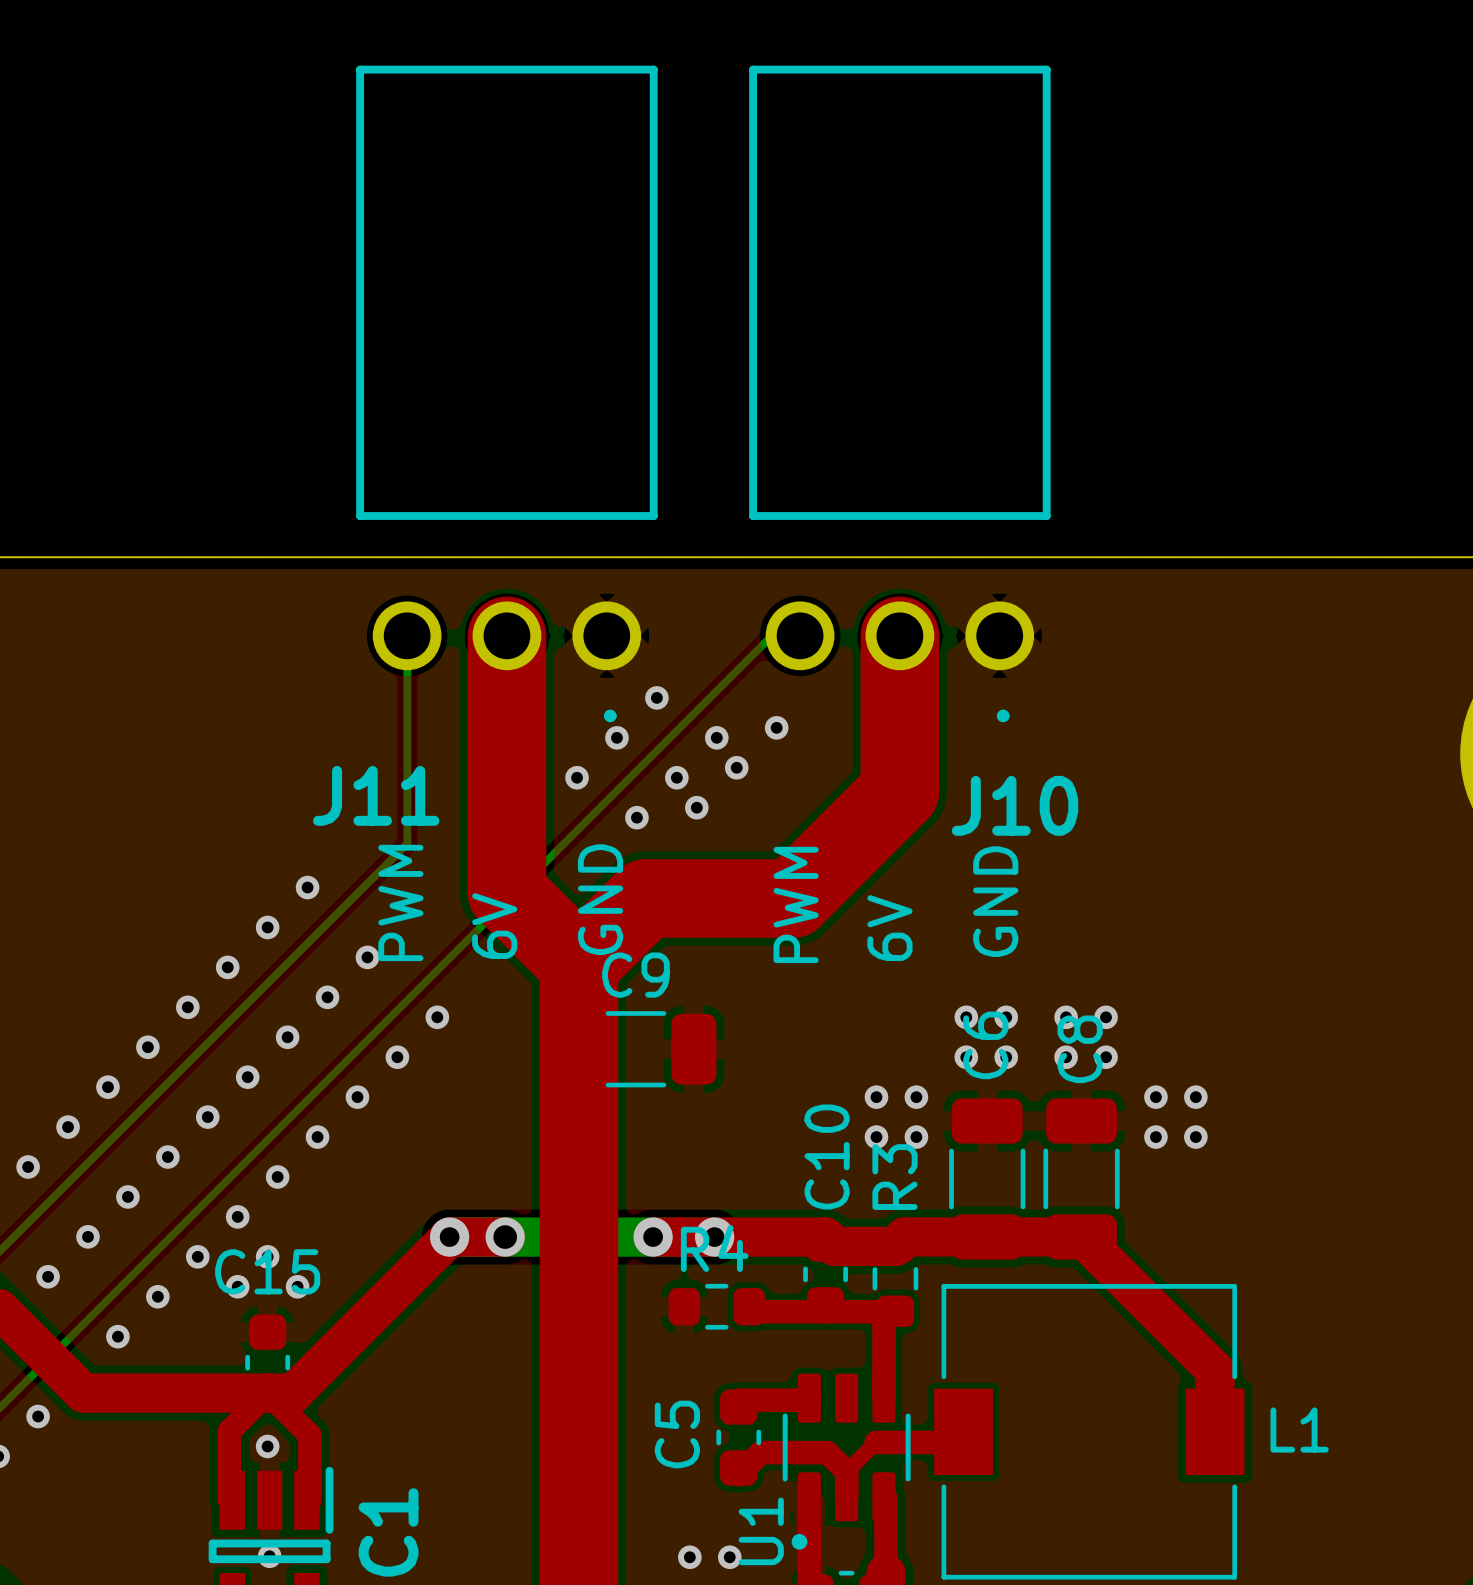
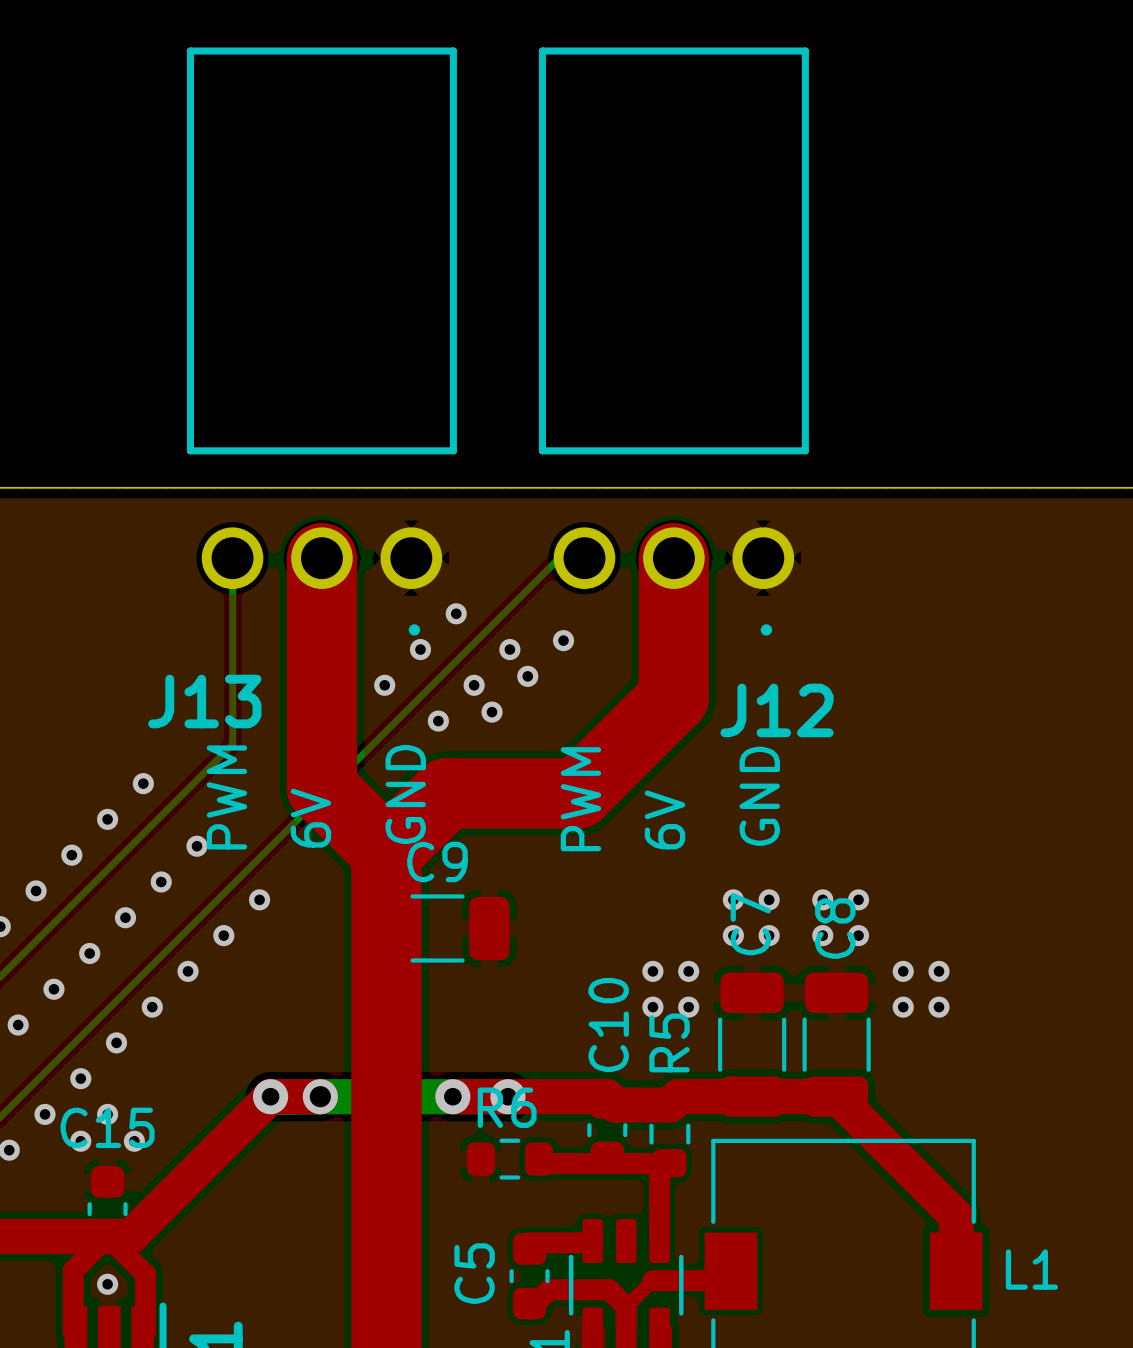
J11 name: J11 (376, 795) -> J13 (204, 701)
J10 name: J10 (1015, 805) -> J12 (777, 710)
C6 name: C6 (985, 1045) -> C7 (750, 924)
R3 name: R3 (894, 1177) -> R5 (669, 1042)
R4 name: R4 (714, 1248) -> R6 (507, 1107)

